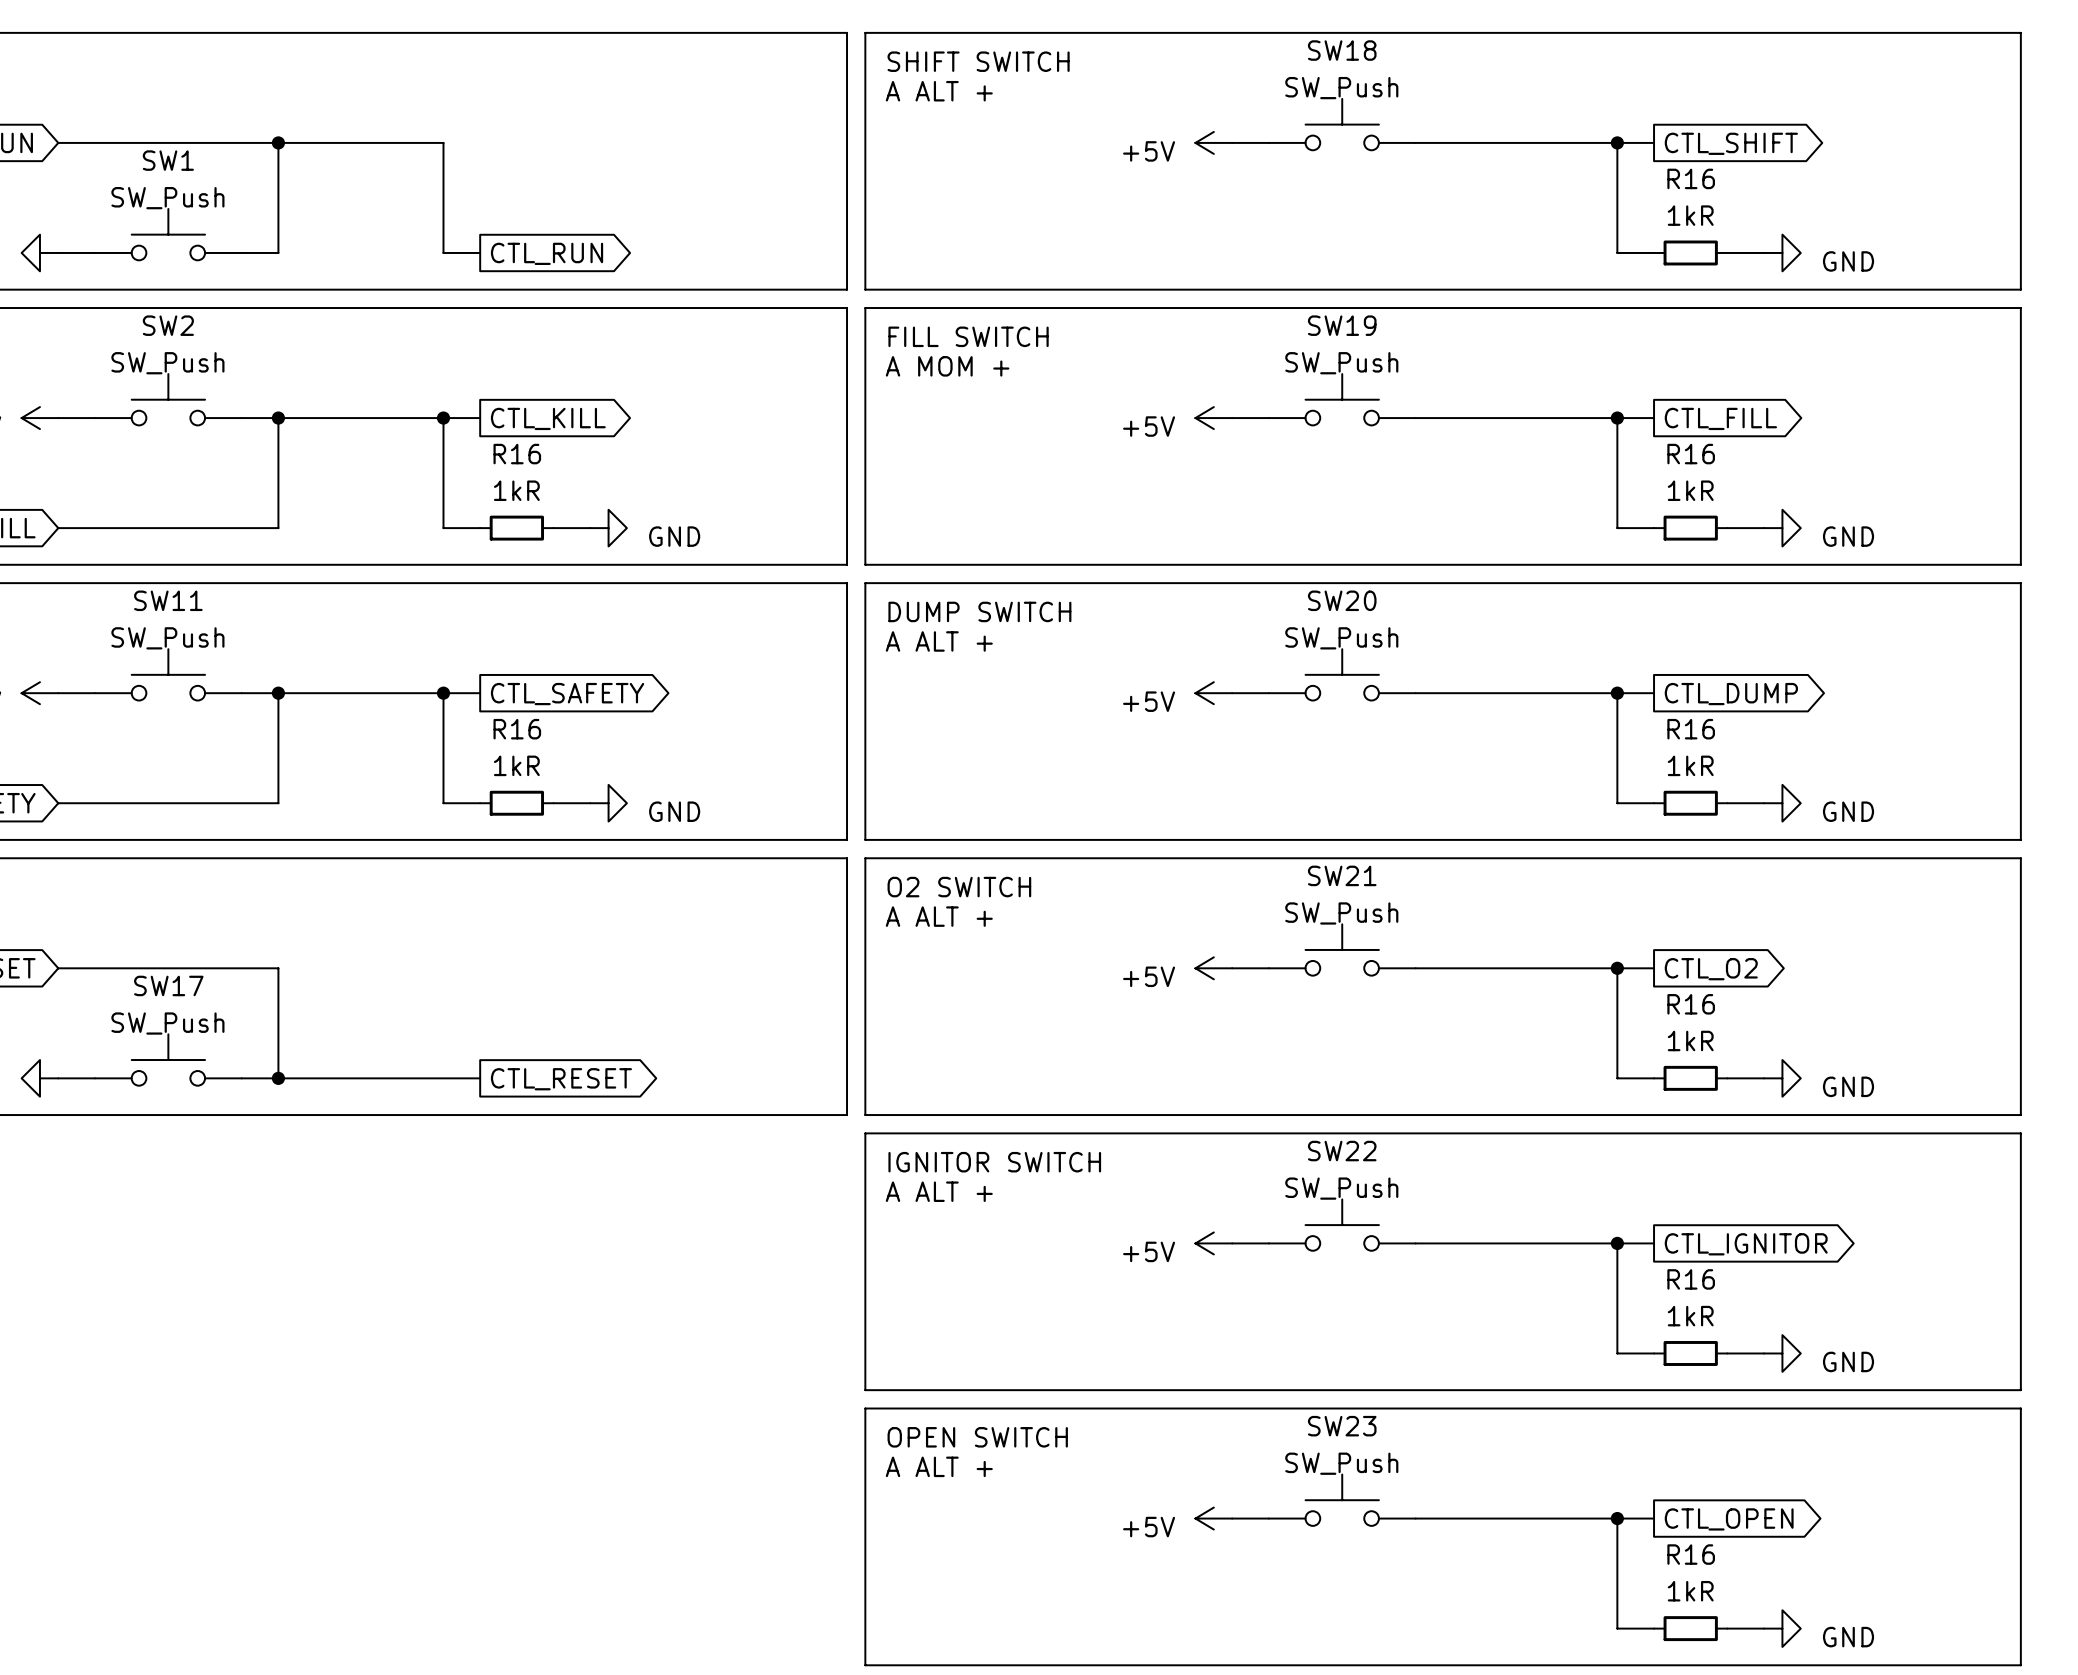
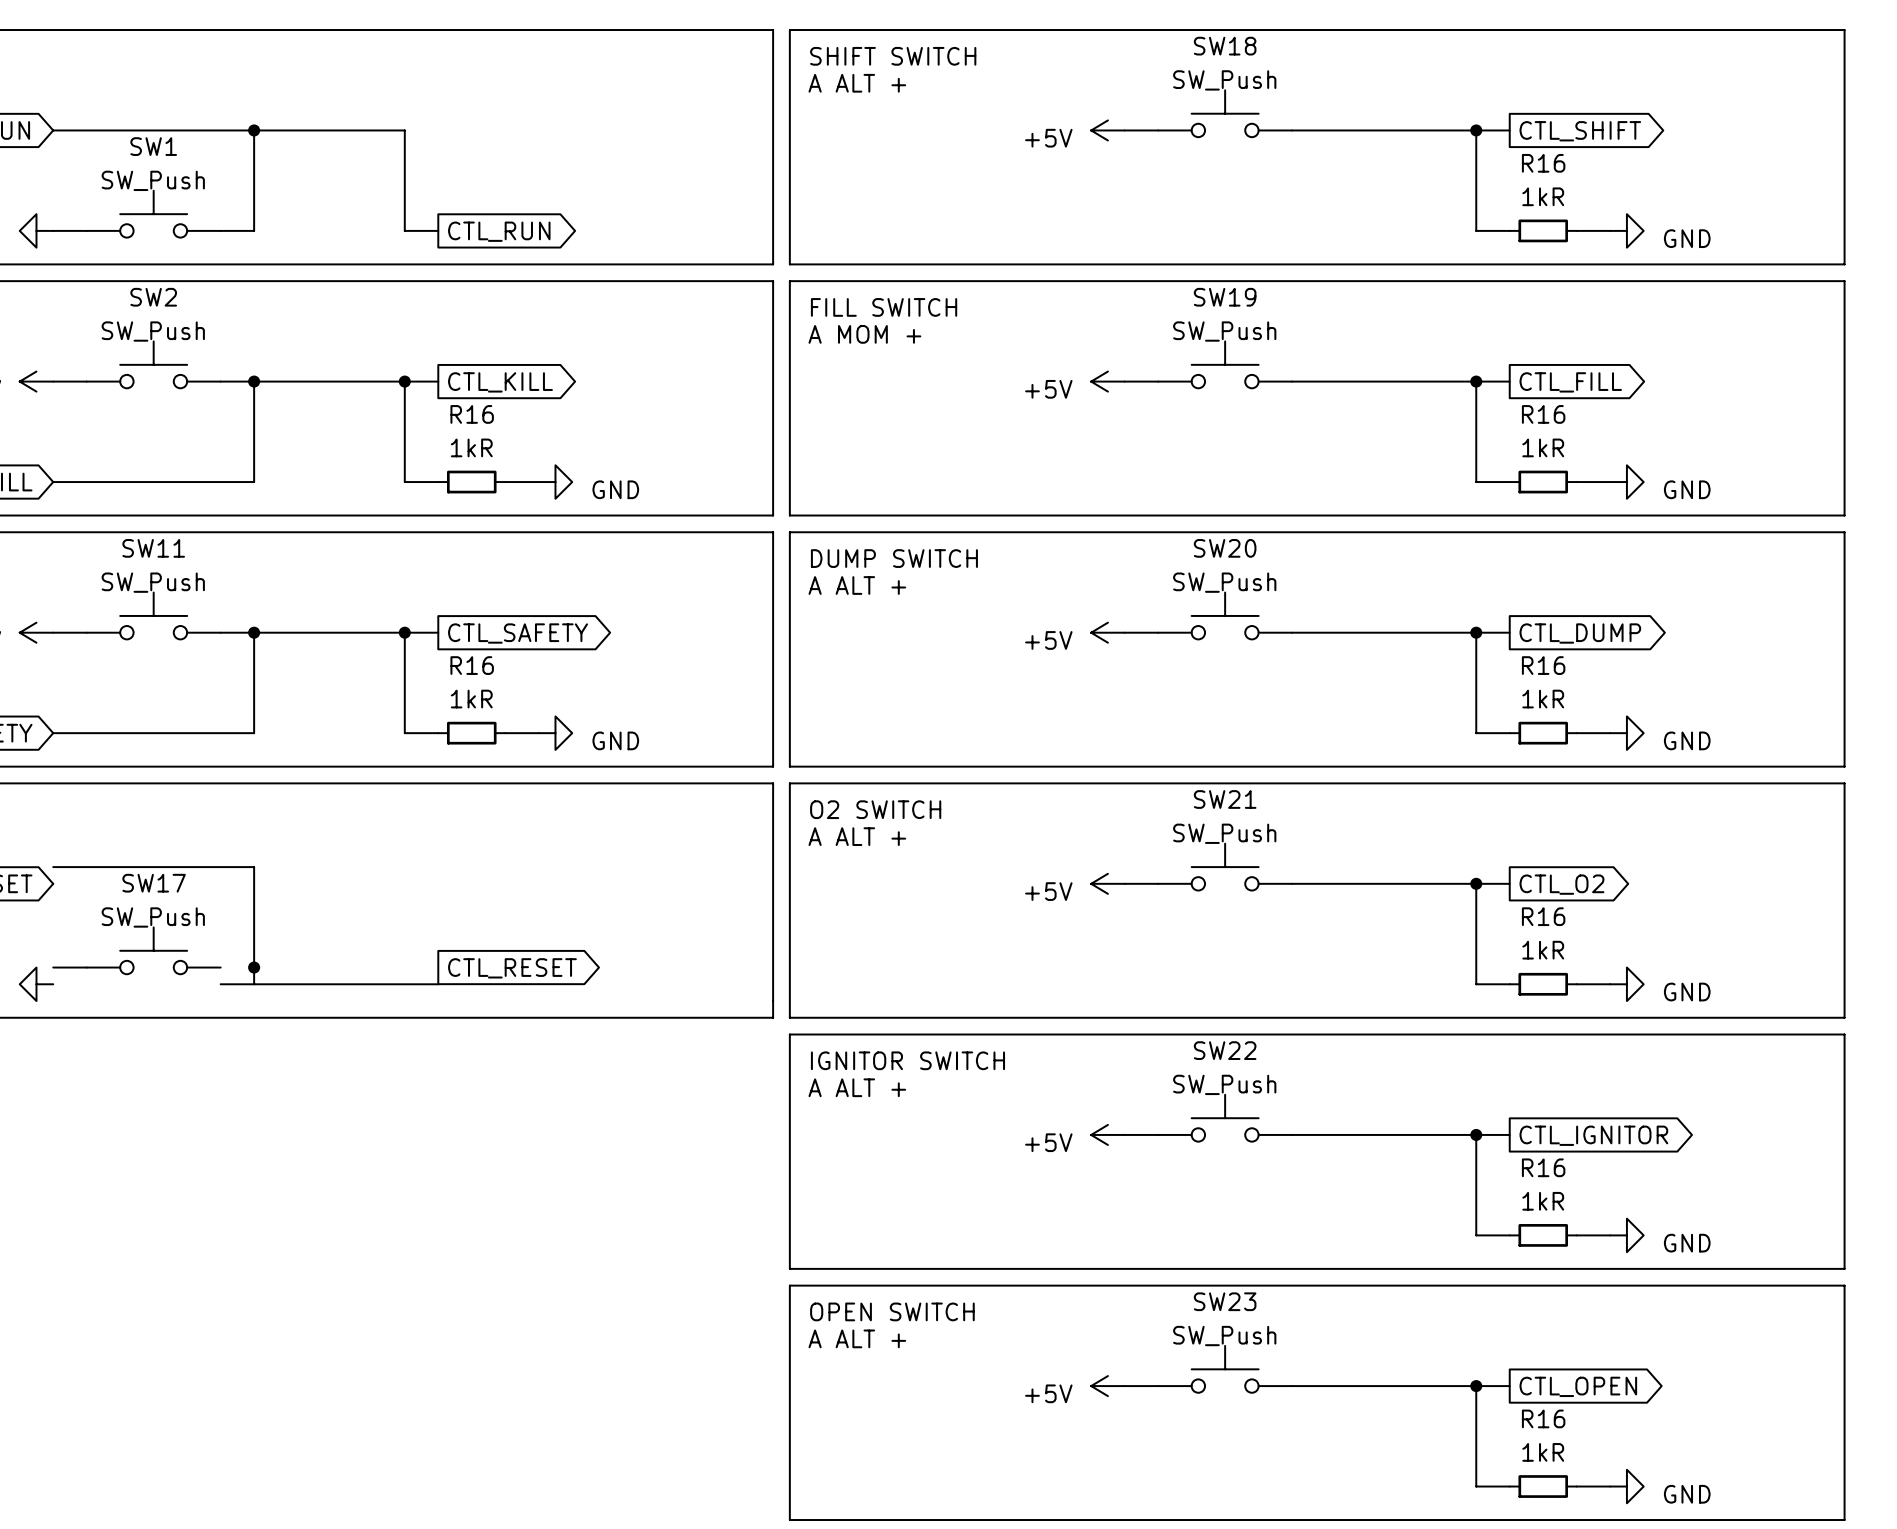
wire: (58, 968) (278, 968) -> (53, 867) (254, 867) (254, 883)
SW17 position: (168, 1060) -> (153, 950)
wire: (58, 1078) (95, 1078) -> (53, 967) (86, 967)
junction position: (278, 1078) -> (254, 967)
global label position: CTL_RESET (561, 1079) -> CTL_RESET (512, 968)

